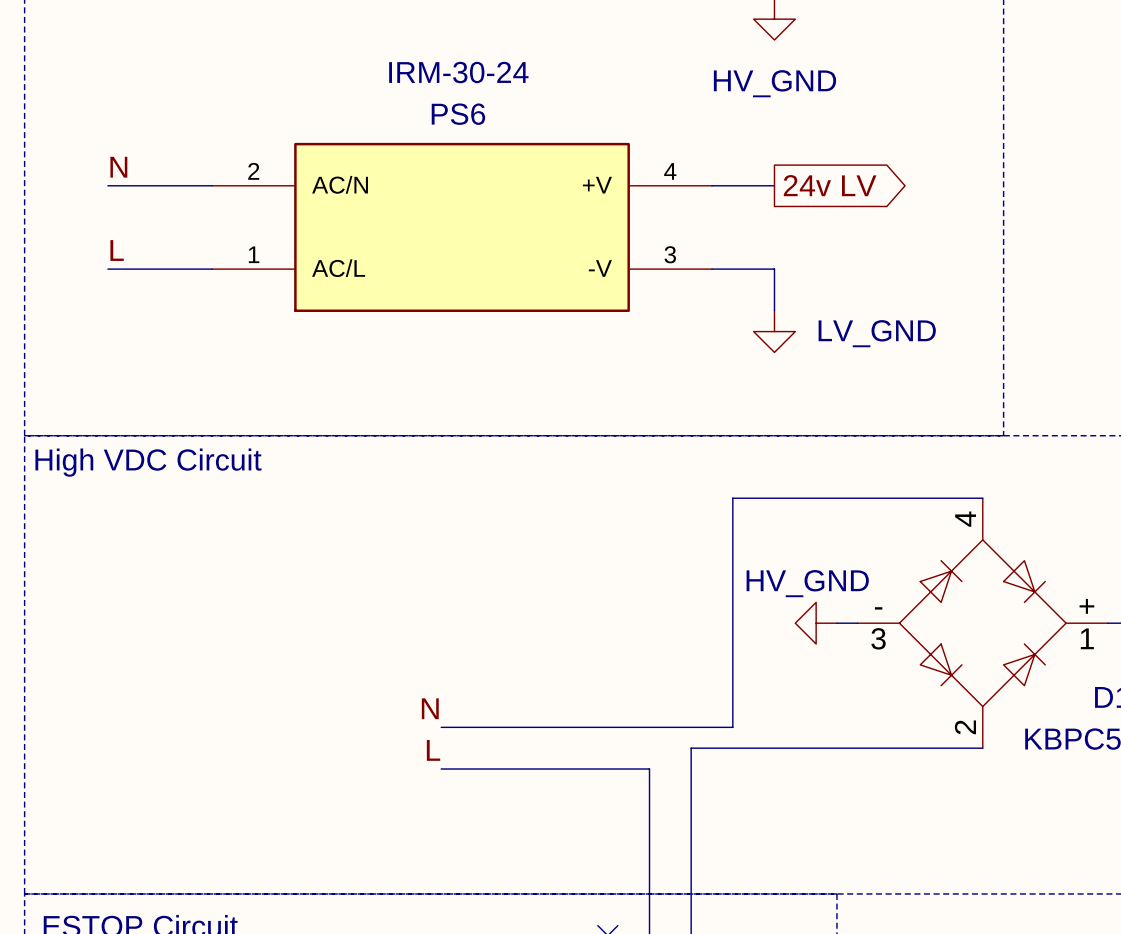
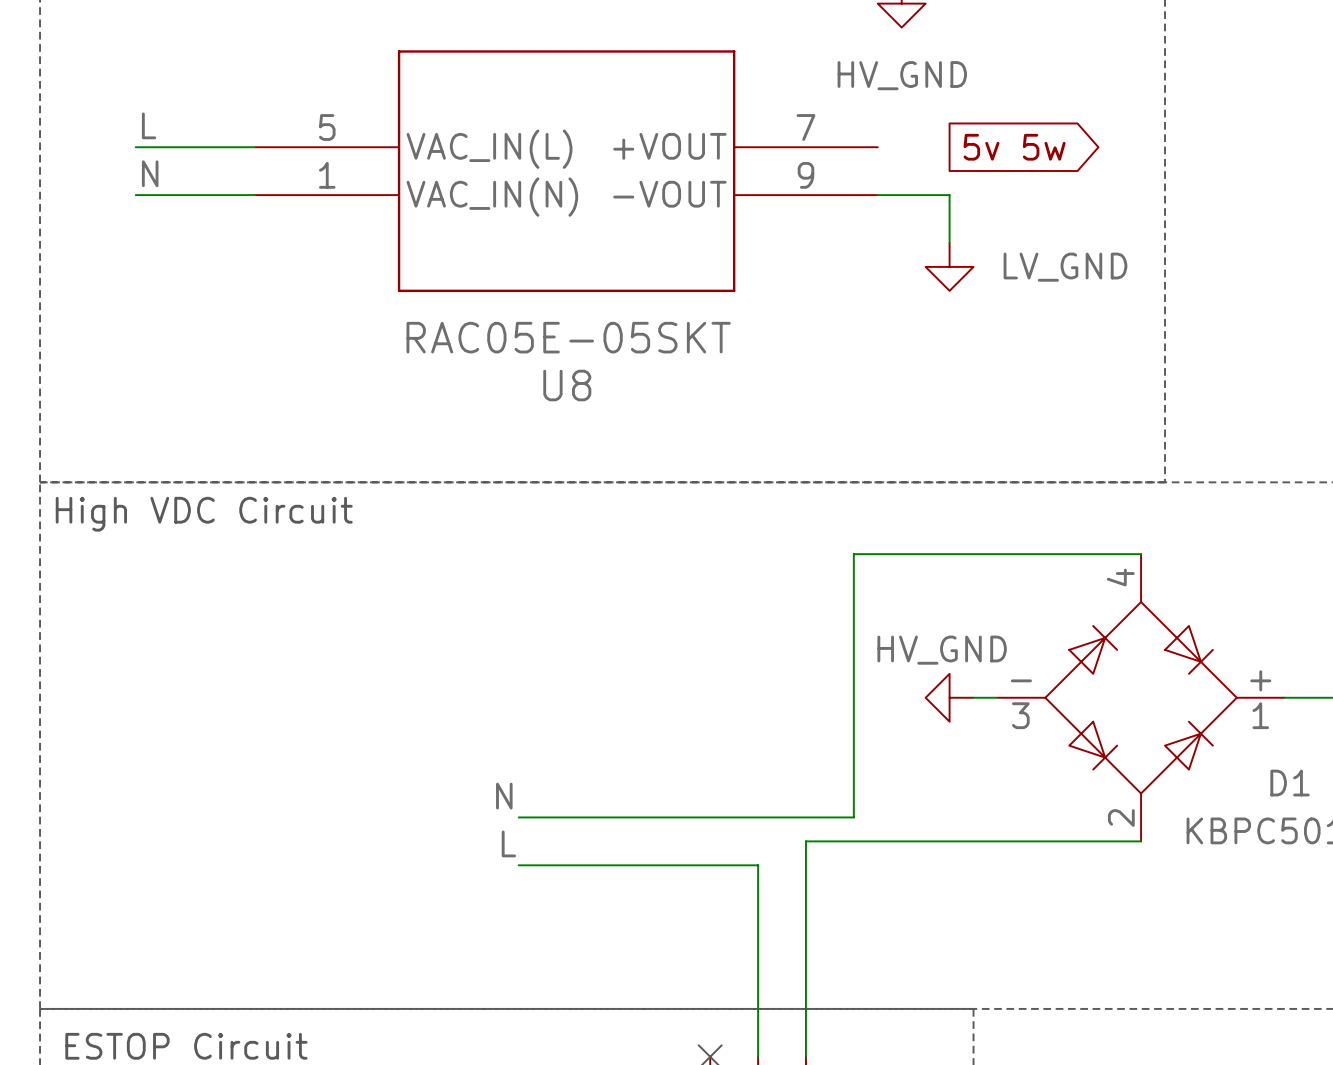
label: none -> L (149, 125)
global label: none -> 5v 5w (1014, 147)
U8: none -> RAC05E-05SKT (566, 171)
wire: none -> (901, 195) (949, 195) (949, 242)
global label: 24v LV (830, 185) -> none
PS6: IRM-30-24 (462, 227) -> none
label: L (117, 250) -> none
wire: (107, 269) (212, 269) -> (135, 147) (255, 147)
wire: (711, 269) (774, 269) (774, 310) -> none
power symbol position: LV_GND (774, 331) -> LV_GND (949, 266)

